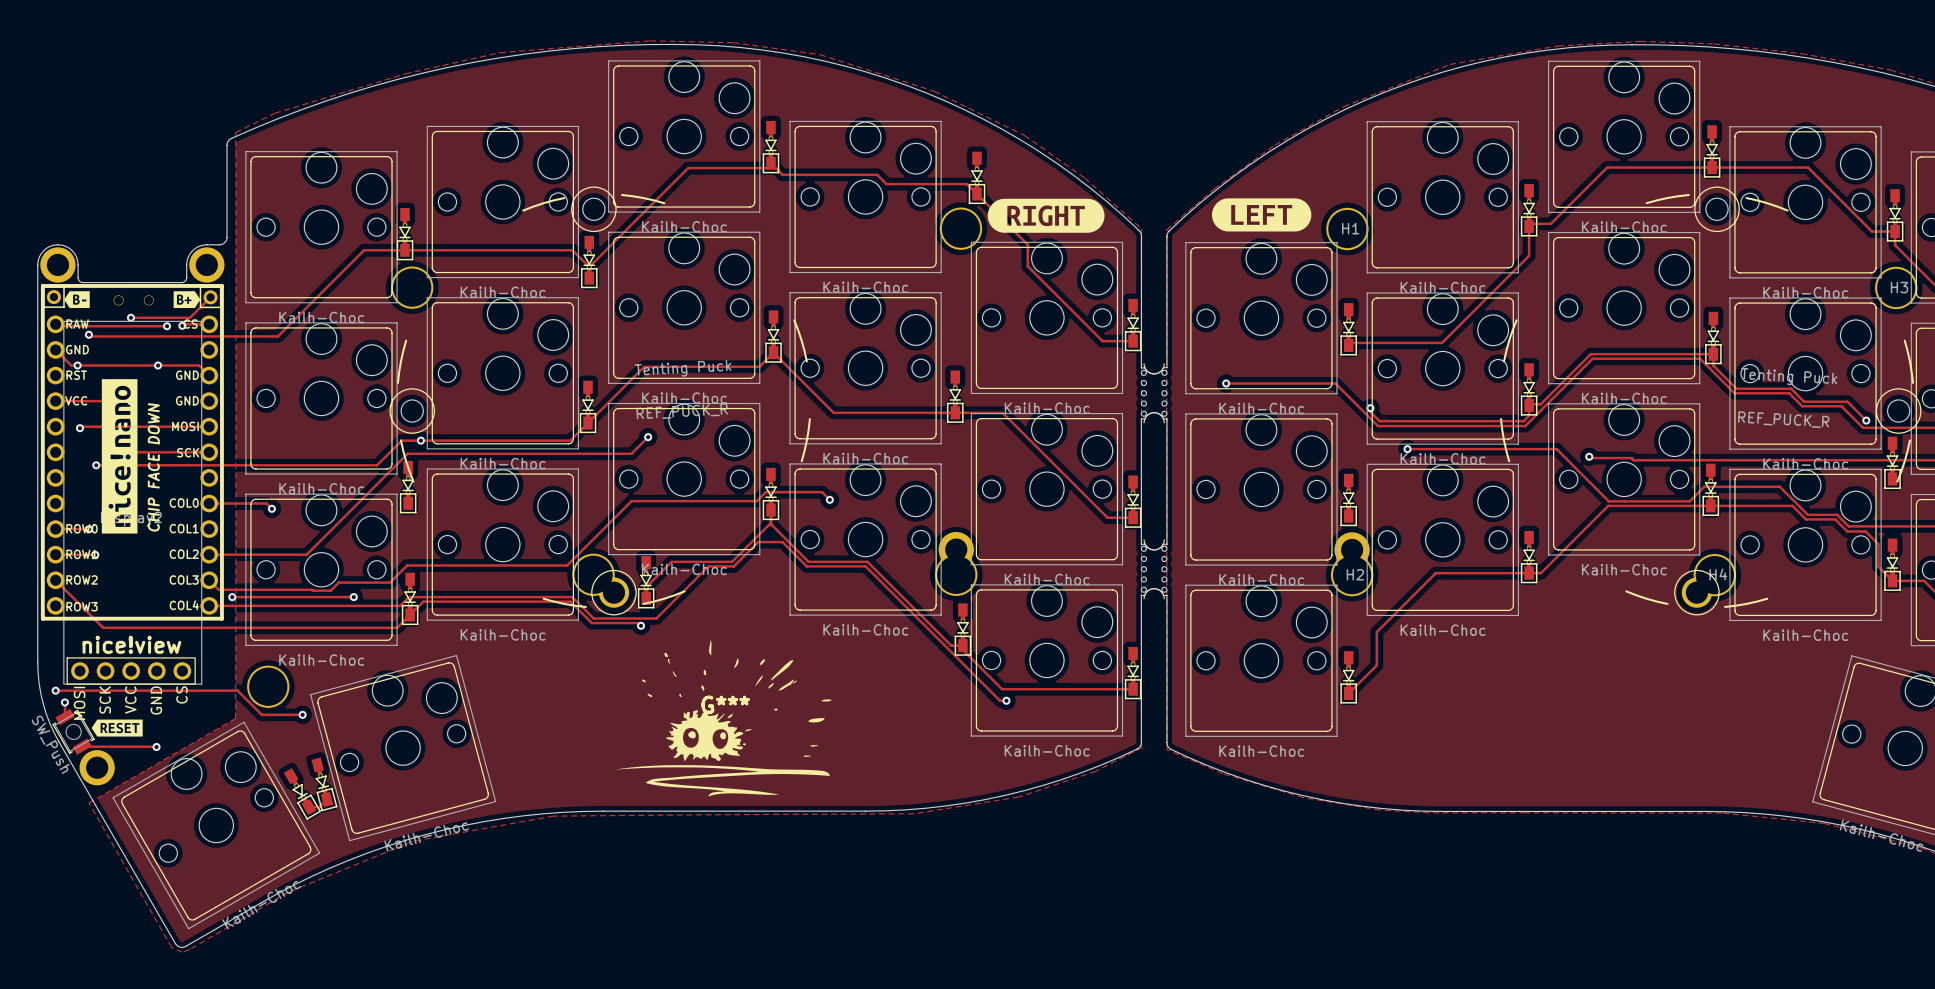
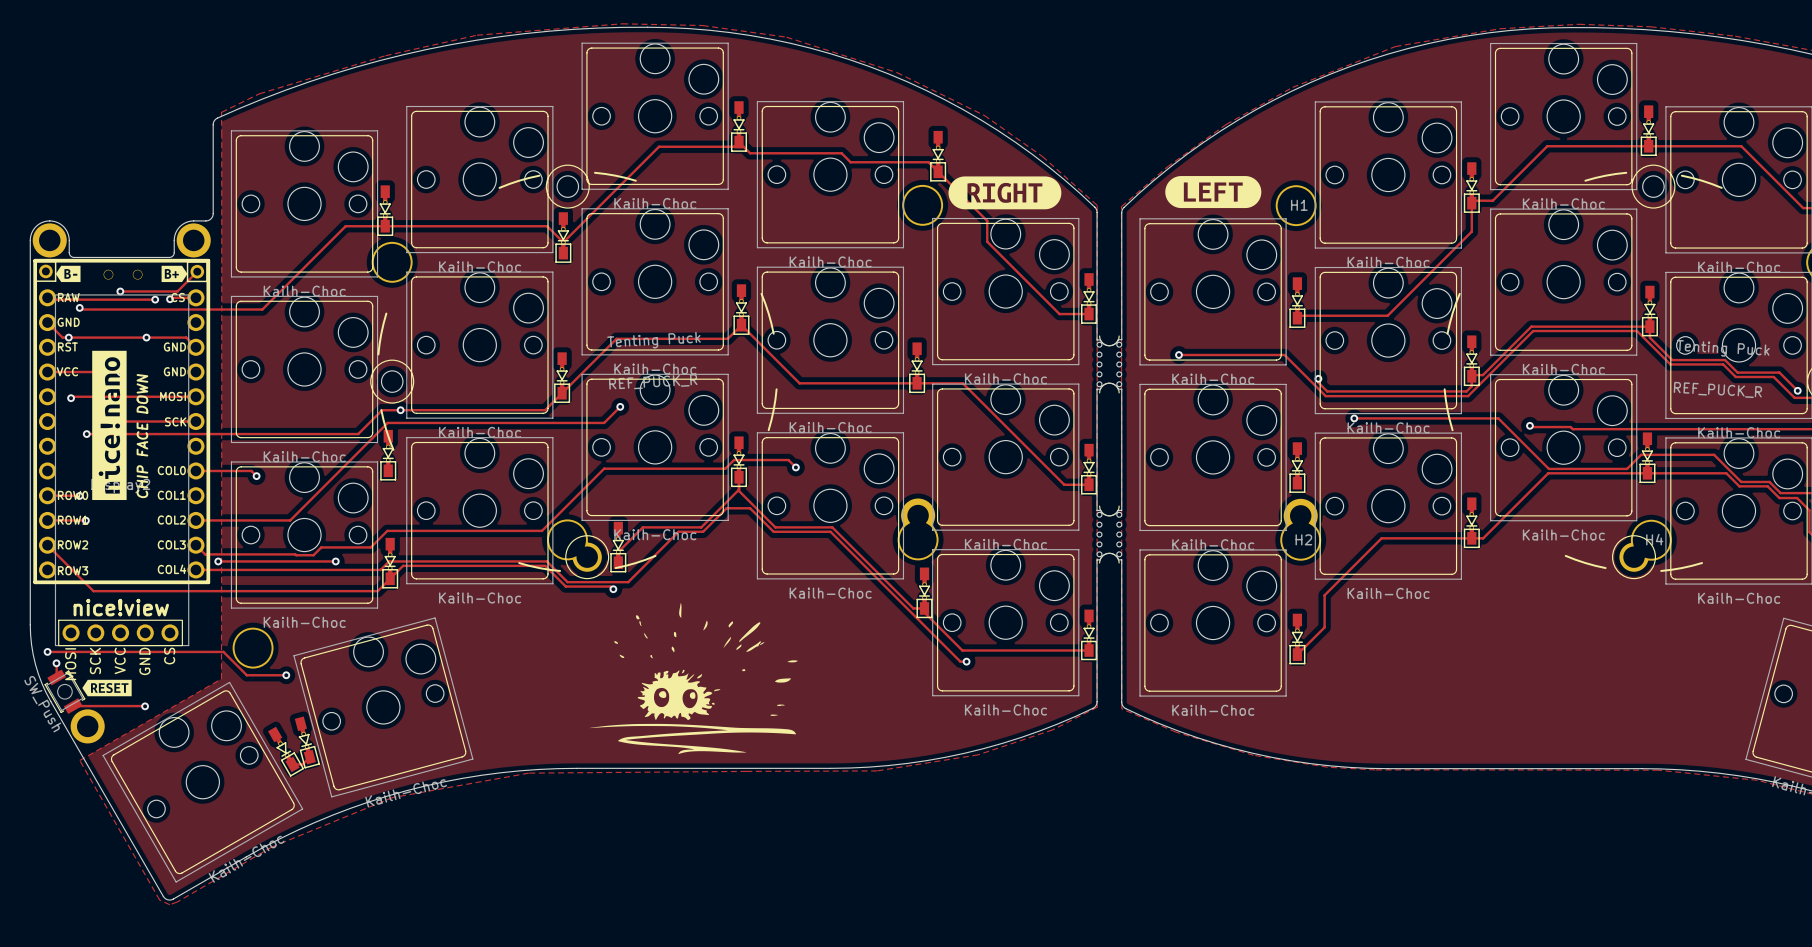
drawing: none -> [589, 603, 798, 755]
G***: (725, 704) -> none
G***: (724, 718) -> none

